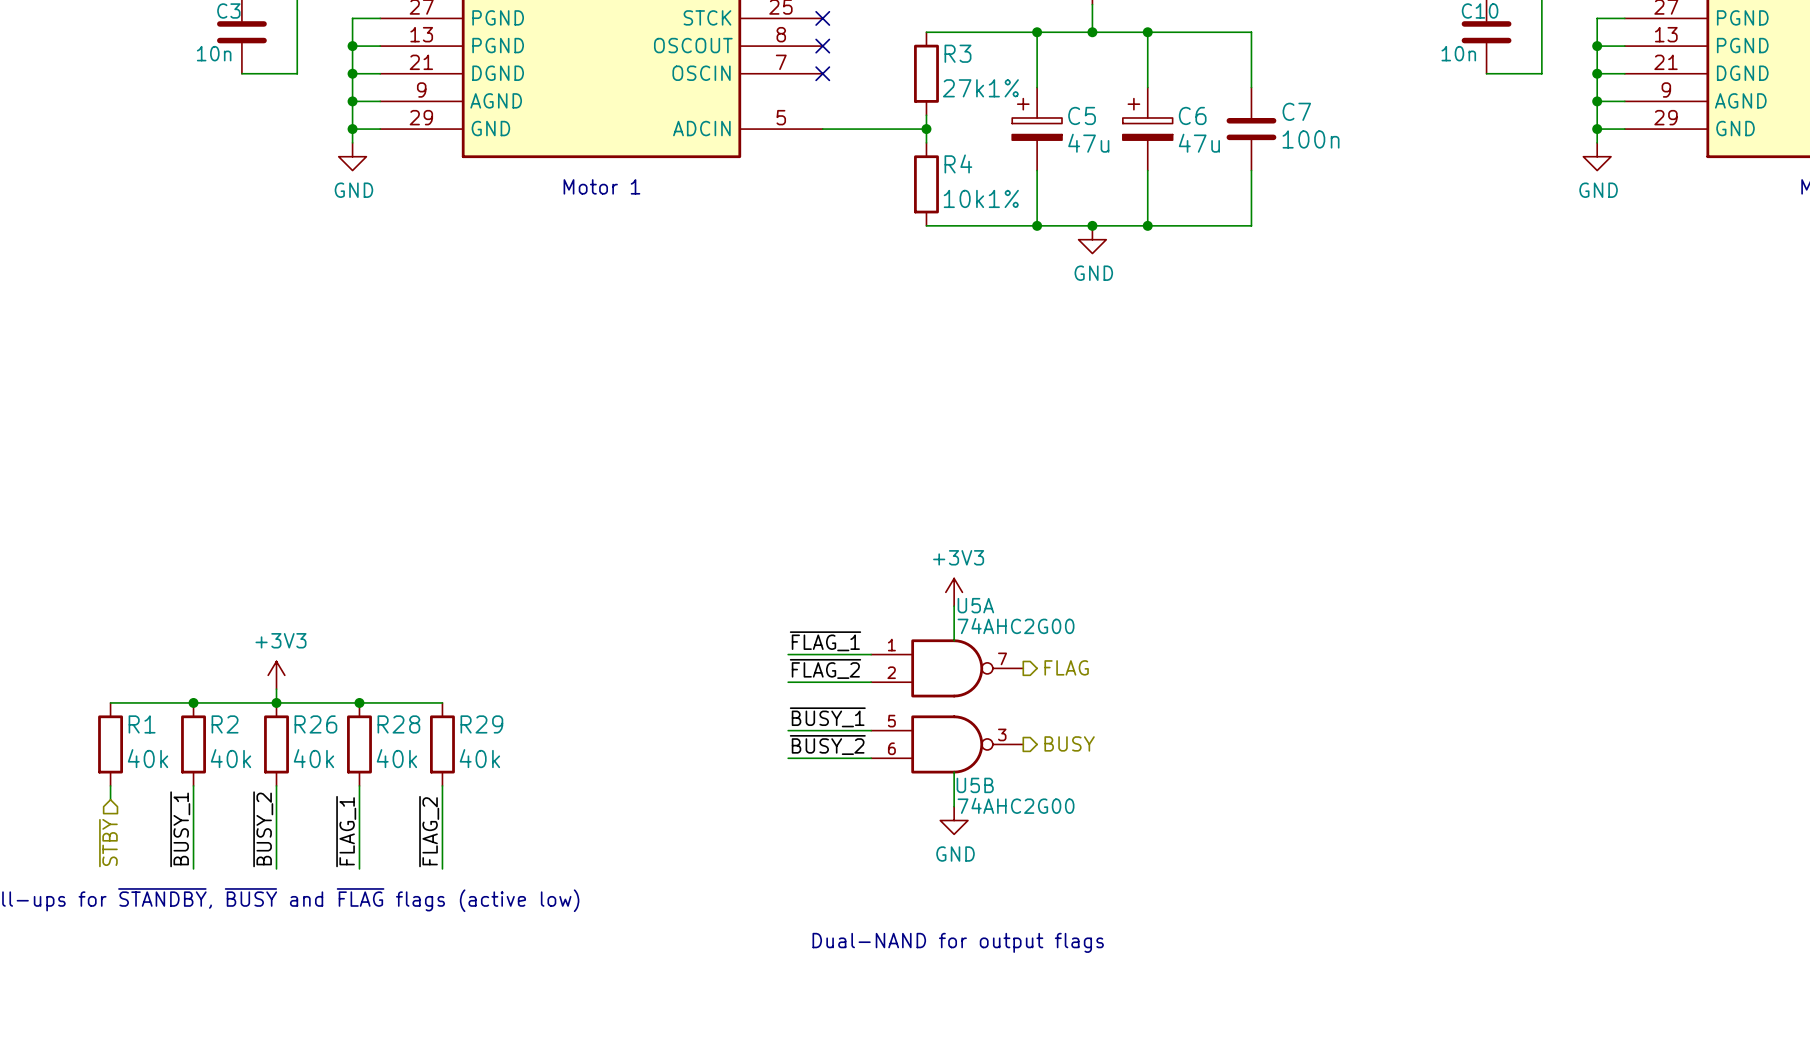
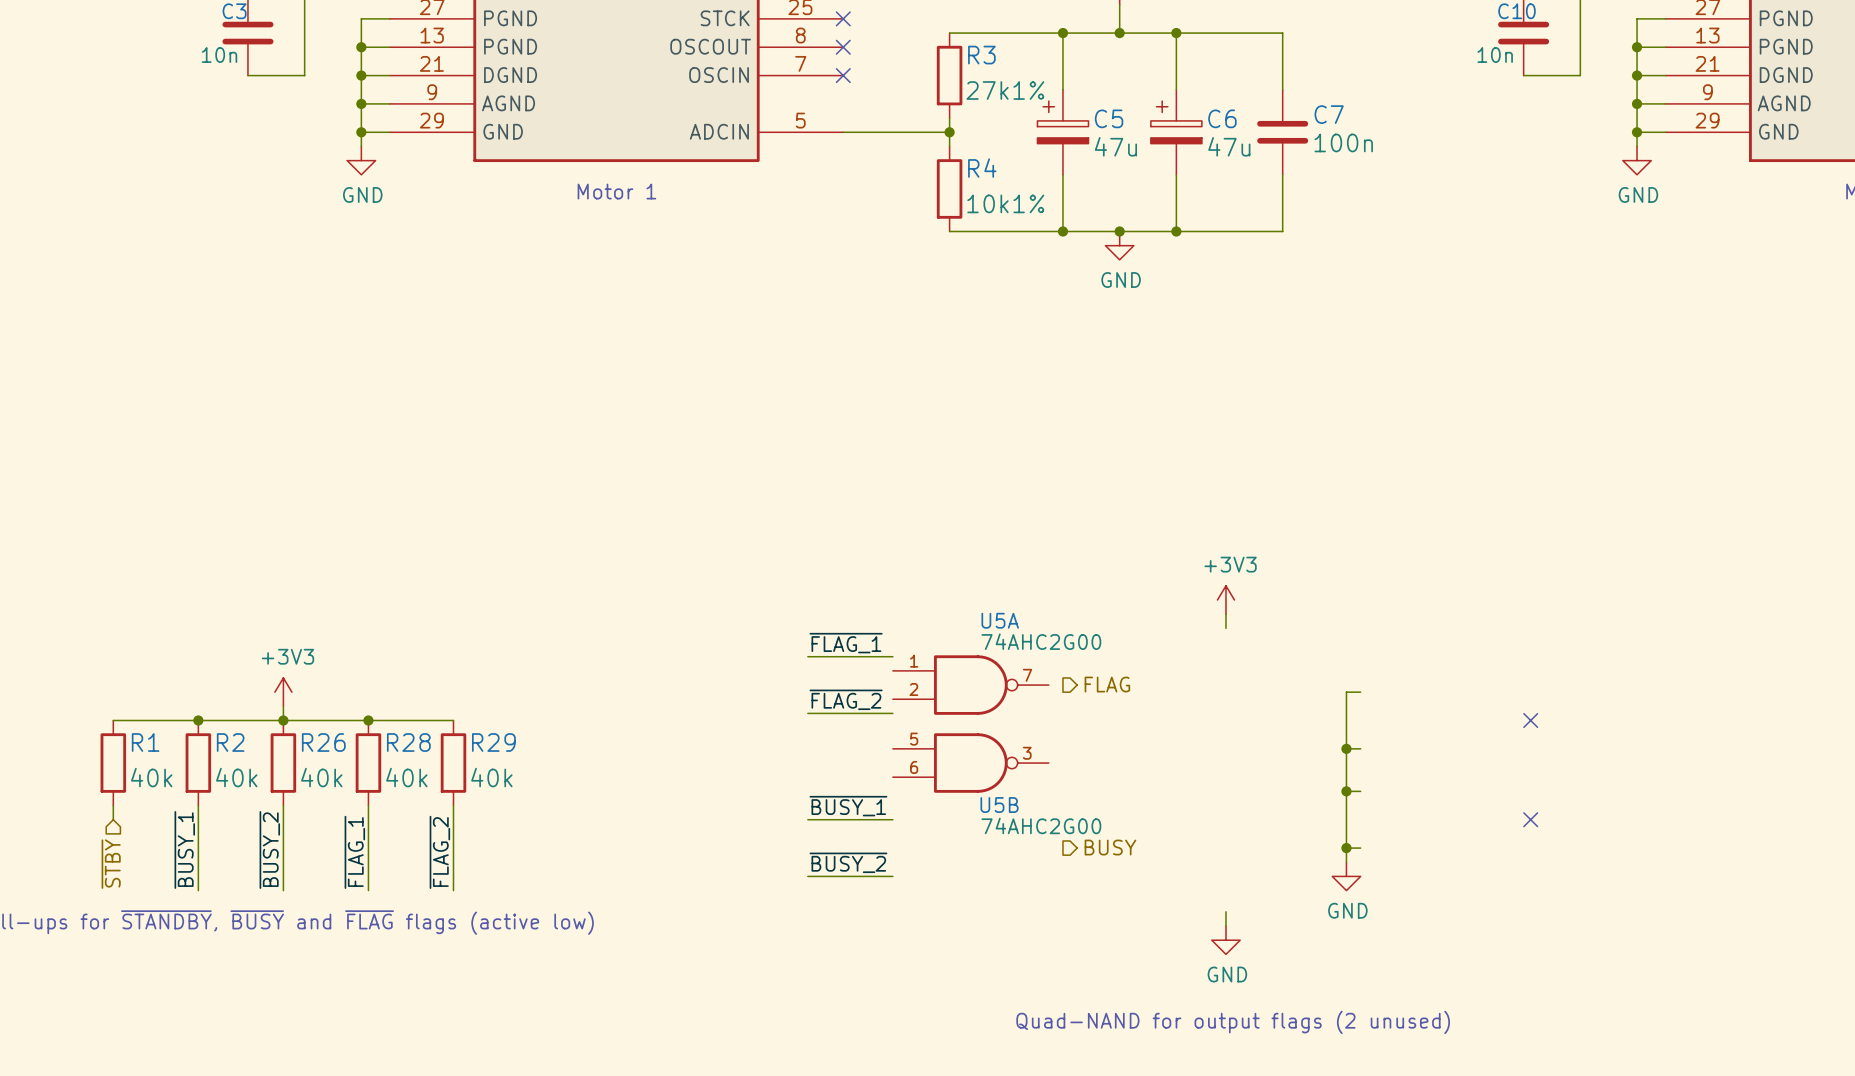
power symbol position: +3V3 (954, 592) -> +3V3 (1225, 600)
wire: none -> (1225, 614) (1225, 628)
wire: (954, 606) (954, 640) -> none
label position: ~{FLAG_1} (825, 641) -> ~{FLAG_1} (846, 643)
wire: (788, 654) (871, 654) -> (807, 713) (892, 713)
hierarchical label position: FLAG (1066, 667) -> FLAG (1107, 684)
label position: ~{FLAG_2} (825, 668) -> ~{FLAG_2} (846, 699)
wire: none -> (1360, 692) (1346, 692) (1346, 862)
wire: (788, 682) (871, 682) -> (807, 656) (892, 656)
no-connect mark: none -> (1530, 720)
label position: ~{BUSY_1} (827, 717) -> ~{BUSY_1} (848, 806)
wire: (788, 730) (871, 730) -> (807, 876) (892, 876)
wire: none -> (1346, 748) (1360, 748)
junction: none -> (1346, 748)
hierarchical label position: BUSY (1069, 743) -> BUSY (1110, 847)
label position: ~{BUSY_2} (827, 745) -> ~{BUSY_2} (848, 862)
wire: (788, 758) (871, 758) -> (807, 819) (892, 819)
wire: (954, 772) (954, 806) -> none
wire: none -> (1346, 791) (1360, 791)
junction: none -> (1346, 791)
no-connect mark: none -> (1530, 819)
power symbol: GND (954, 820) -> none
wire: none -> (1346, 848) (1360, 848)
junction: none -> (1346, 848)
power symbol: none -> GND (1346, 876)
wire: none -> (1225, 911) (1225, 926)
power symbol: none -> GND (1225, 940)
text: Dual-NAND for output flags (958, 942) -> none
text: none -> Quad-NAND for output flags (2 unused) (1233, 1022)

